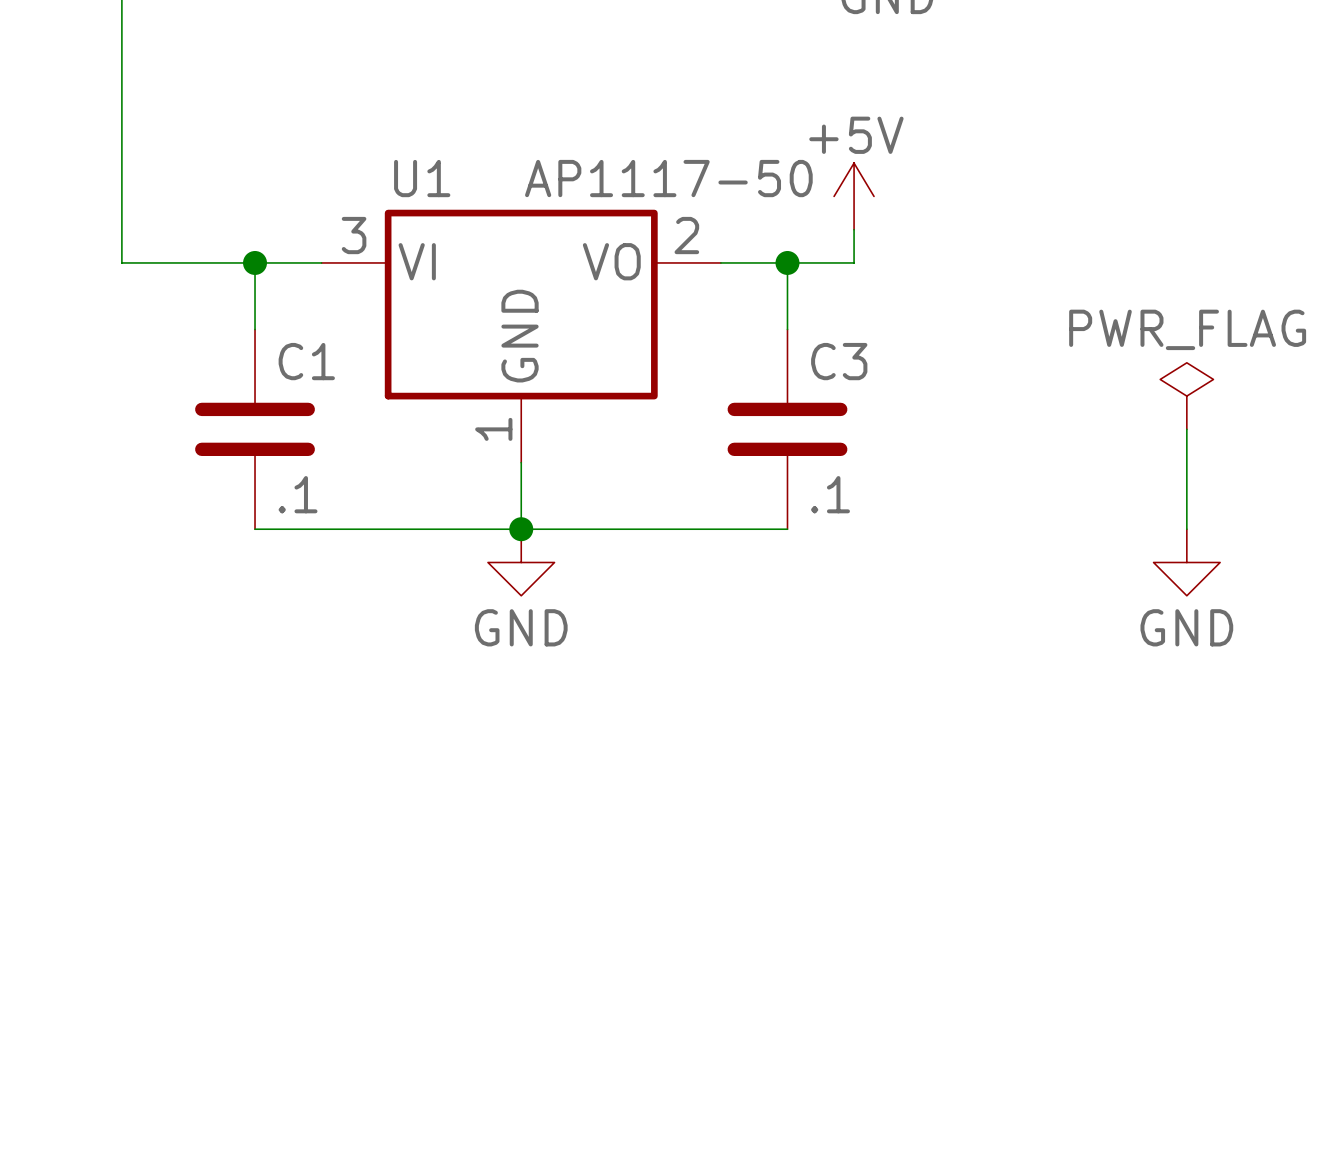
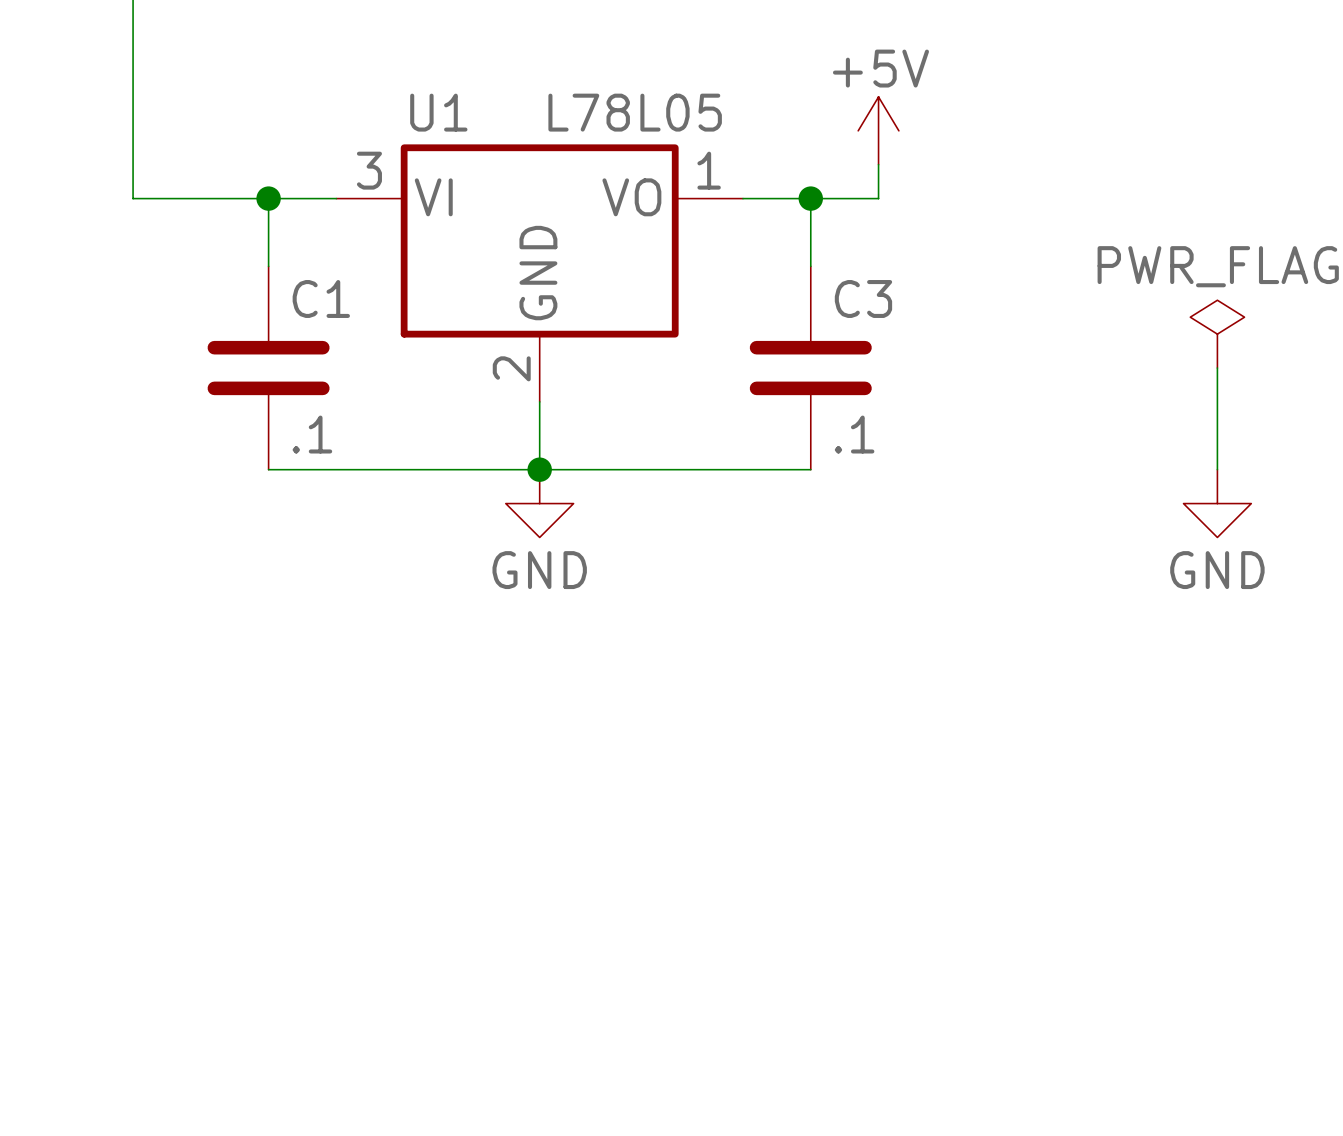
U1 value: AP1117-50 (668, 178) -> L78L05 (635, 112)
U1 pin number: 2 (686, 235) -> 1 (709, 170)
U1 pin number: 1 (493, 429) -> 2 (511, 368)

